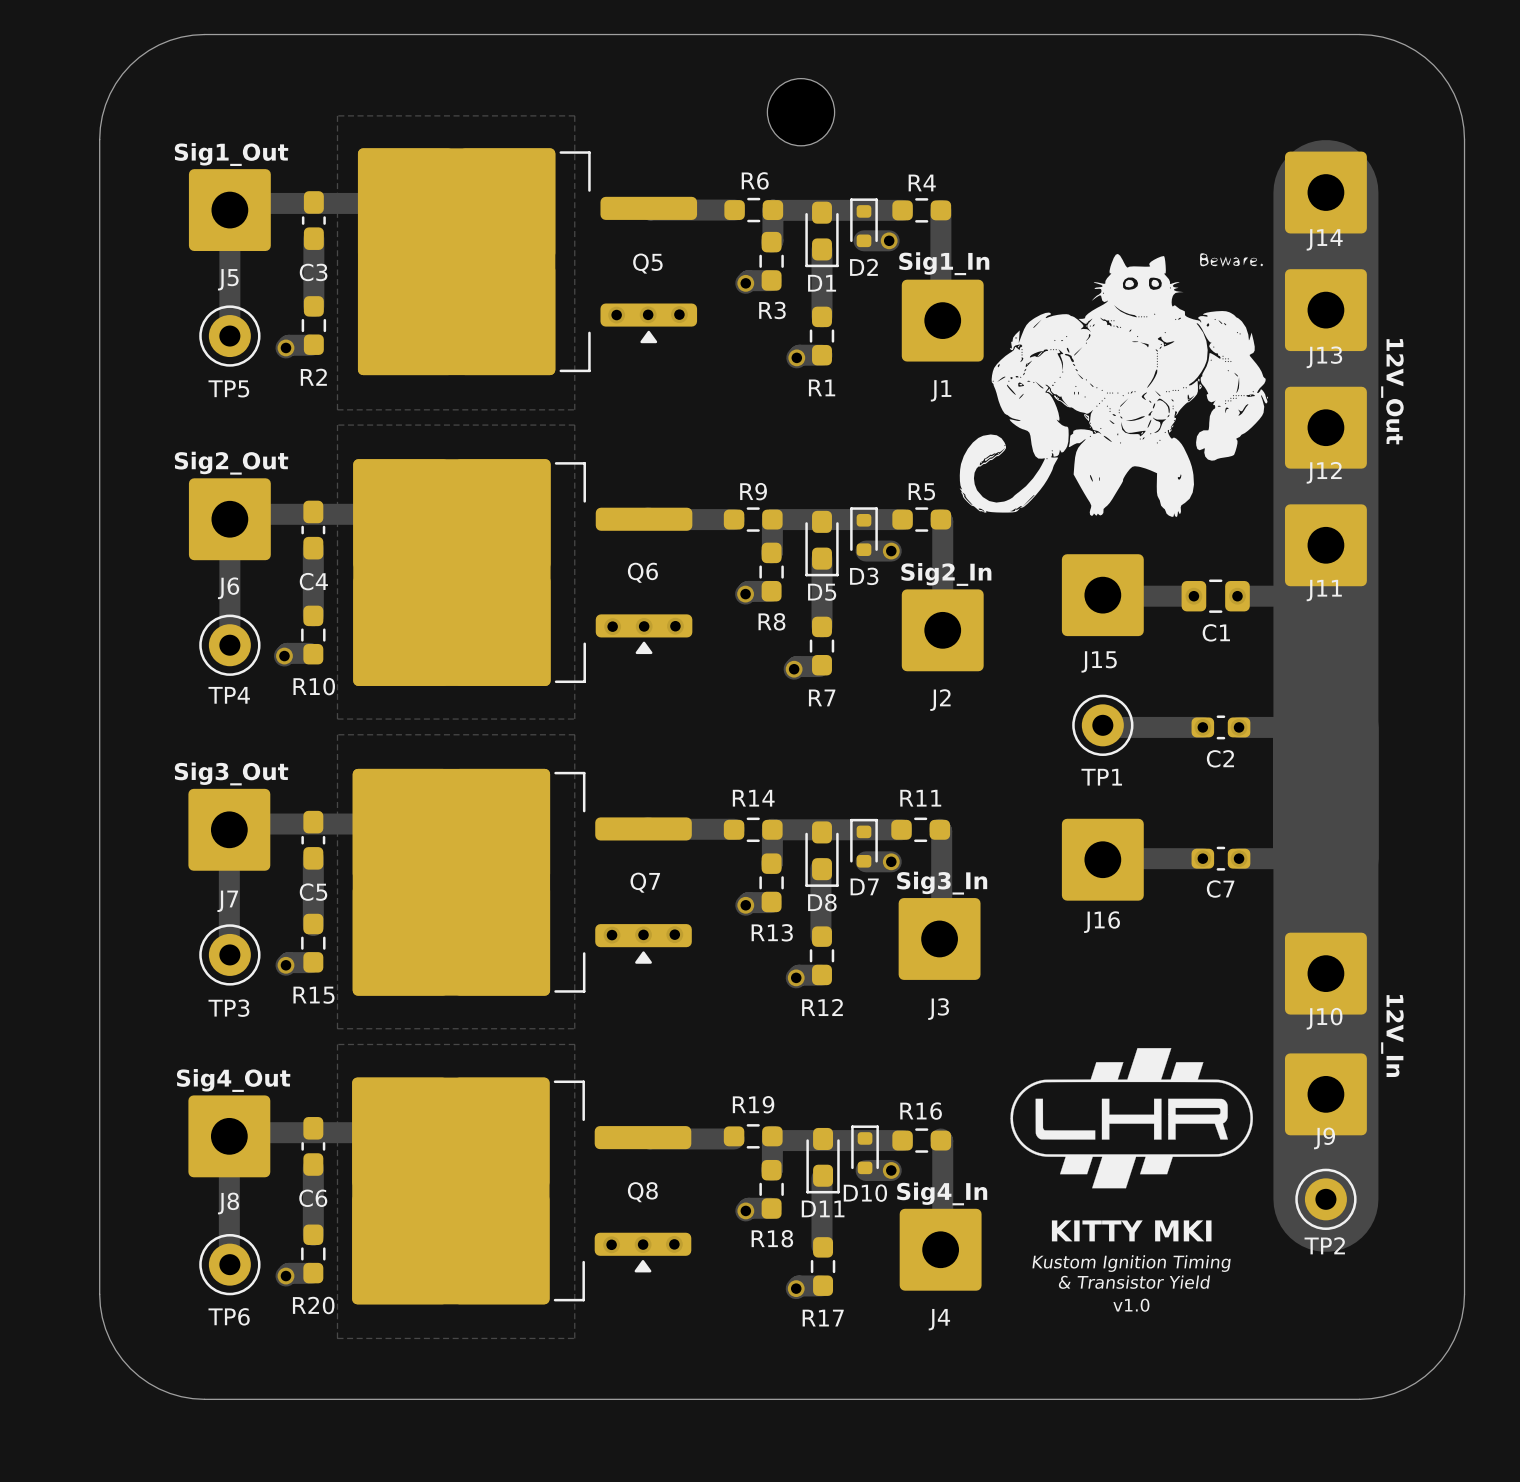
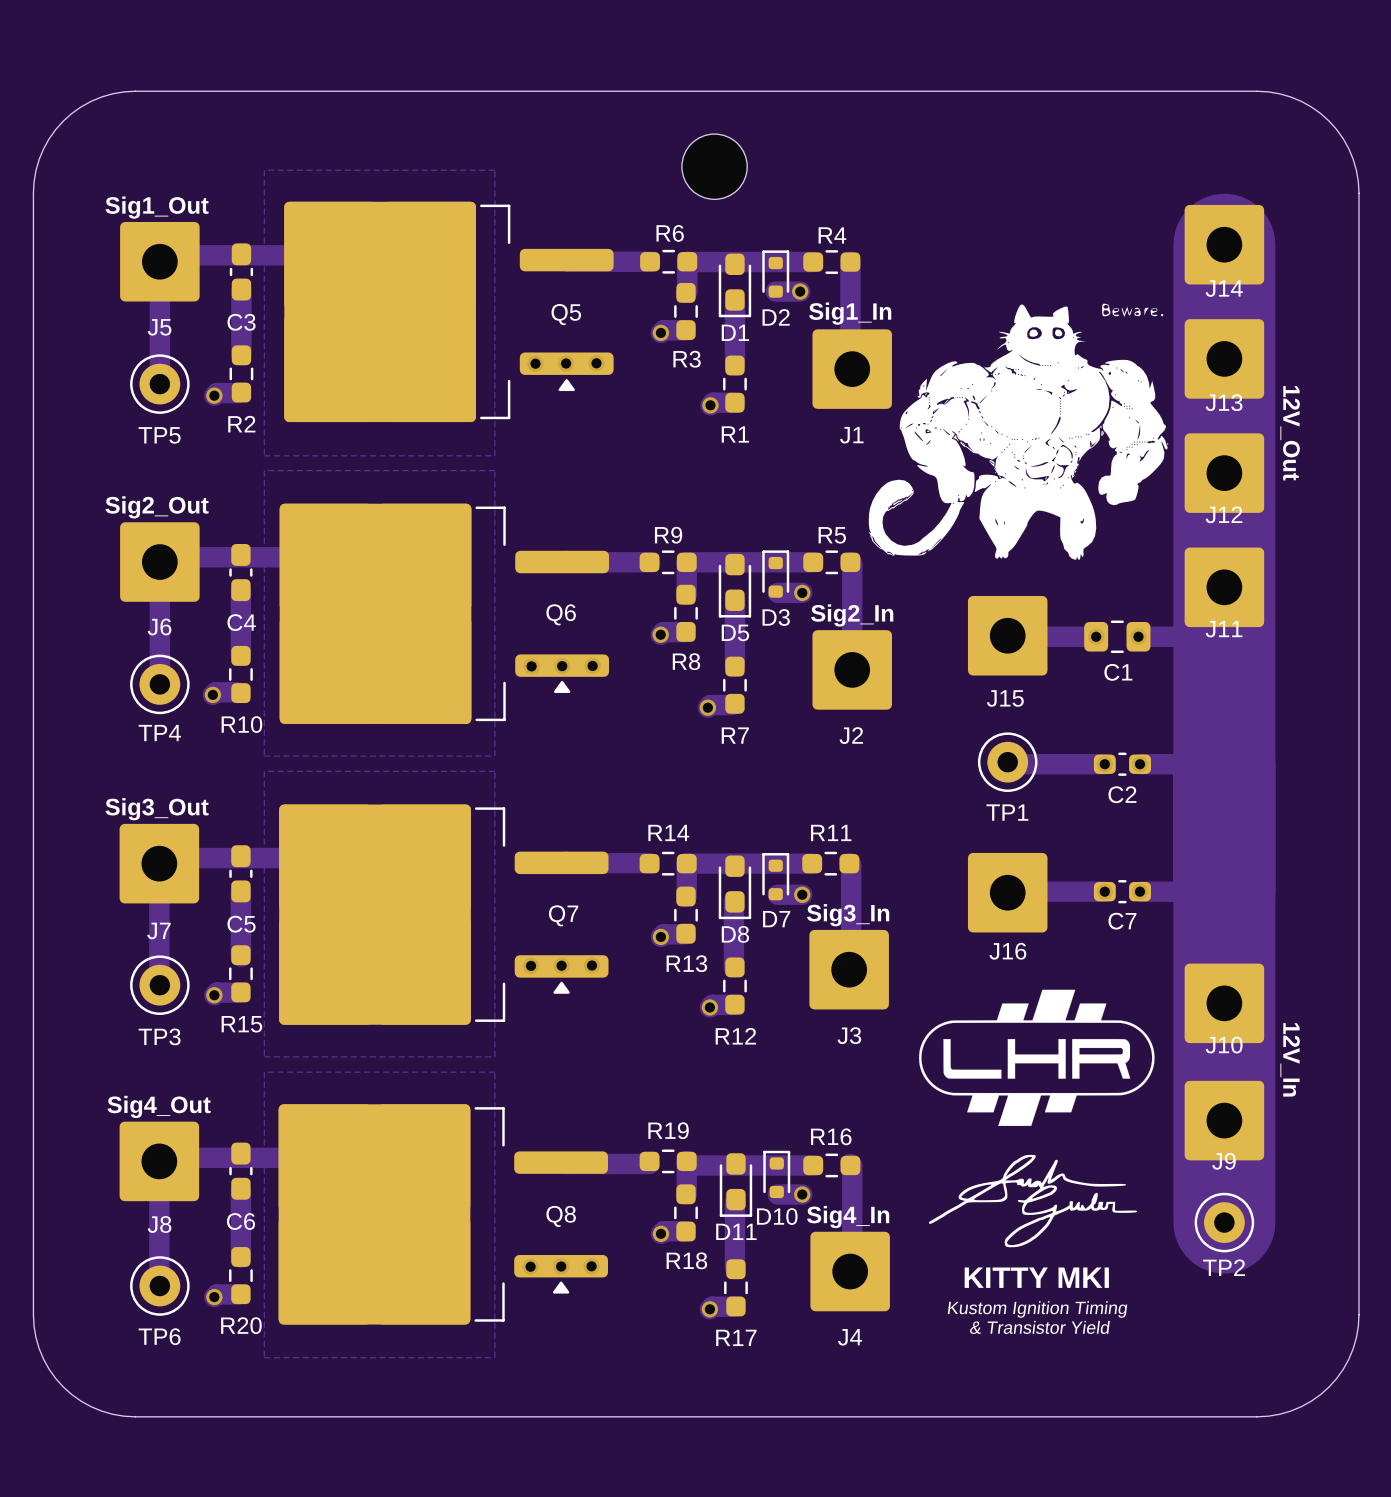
drawing position: (1131, 1118) -> (1036, 1057)
drawing: none -> [928, 1154, 1138, 1248]
text: KITTY MKI (1131, 1230) -> none
text: Kustom Ignition Timing (1131, 1263) -> KITTY MKI (1036, 1277)
text: & Transistor Yield (1134, 1282) -> Kustom Ignition Timing (1037, 1309)
text: v1.0 (1131, 1305) -> & Transistor Yield (1039, 1327)

